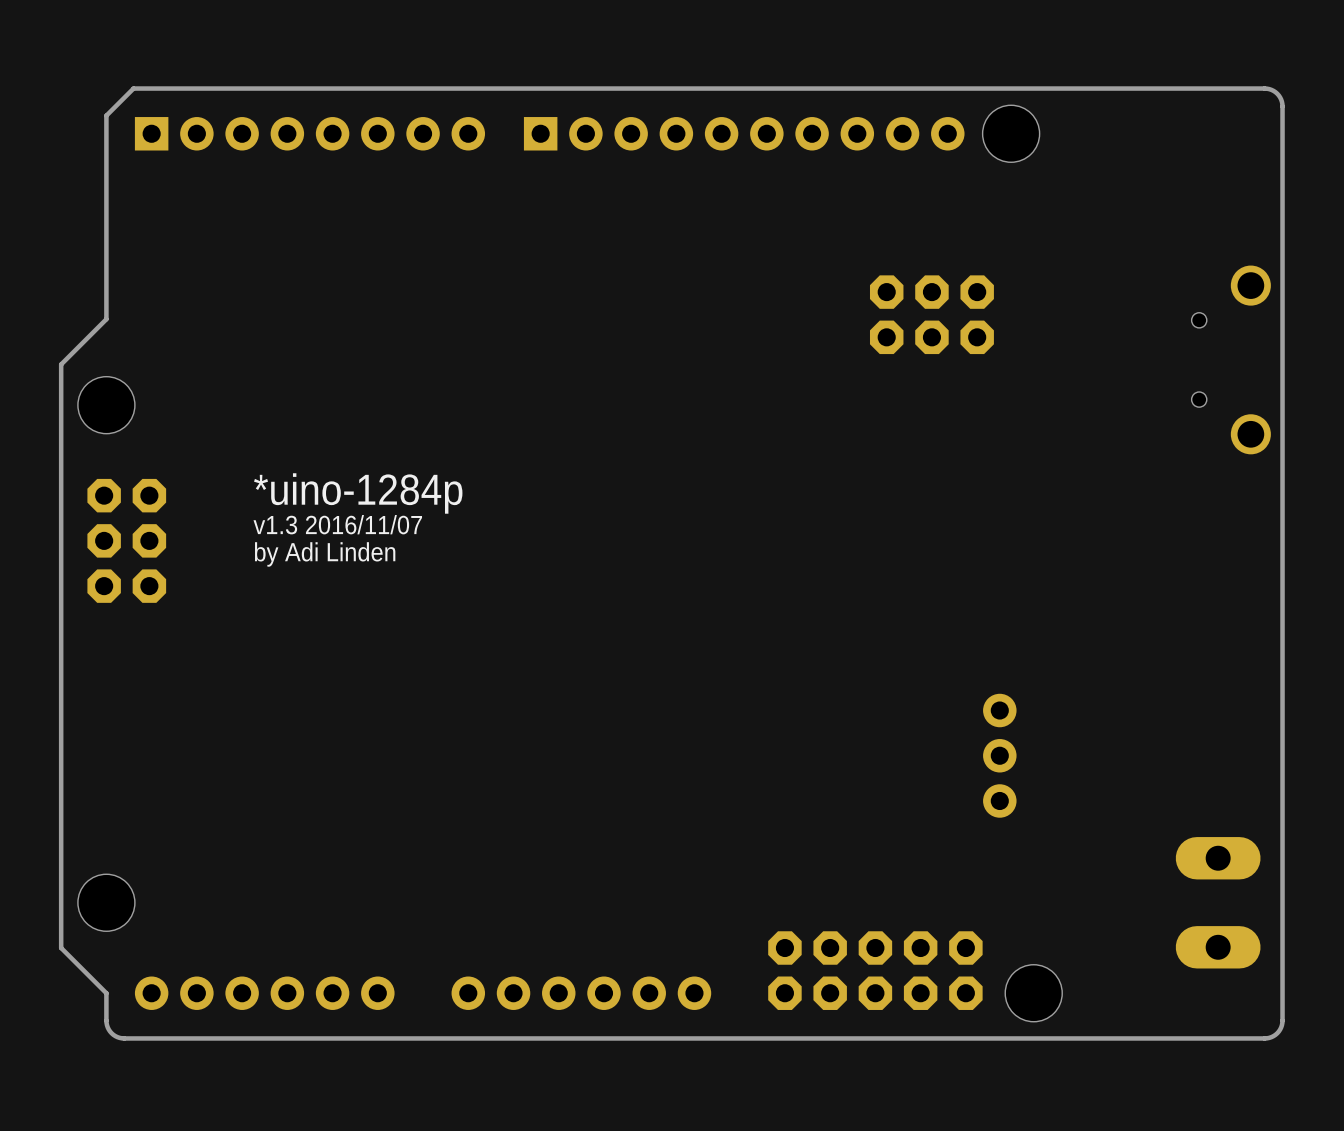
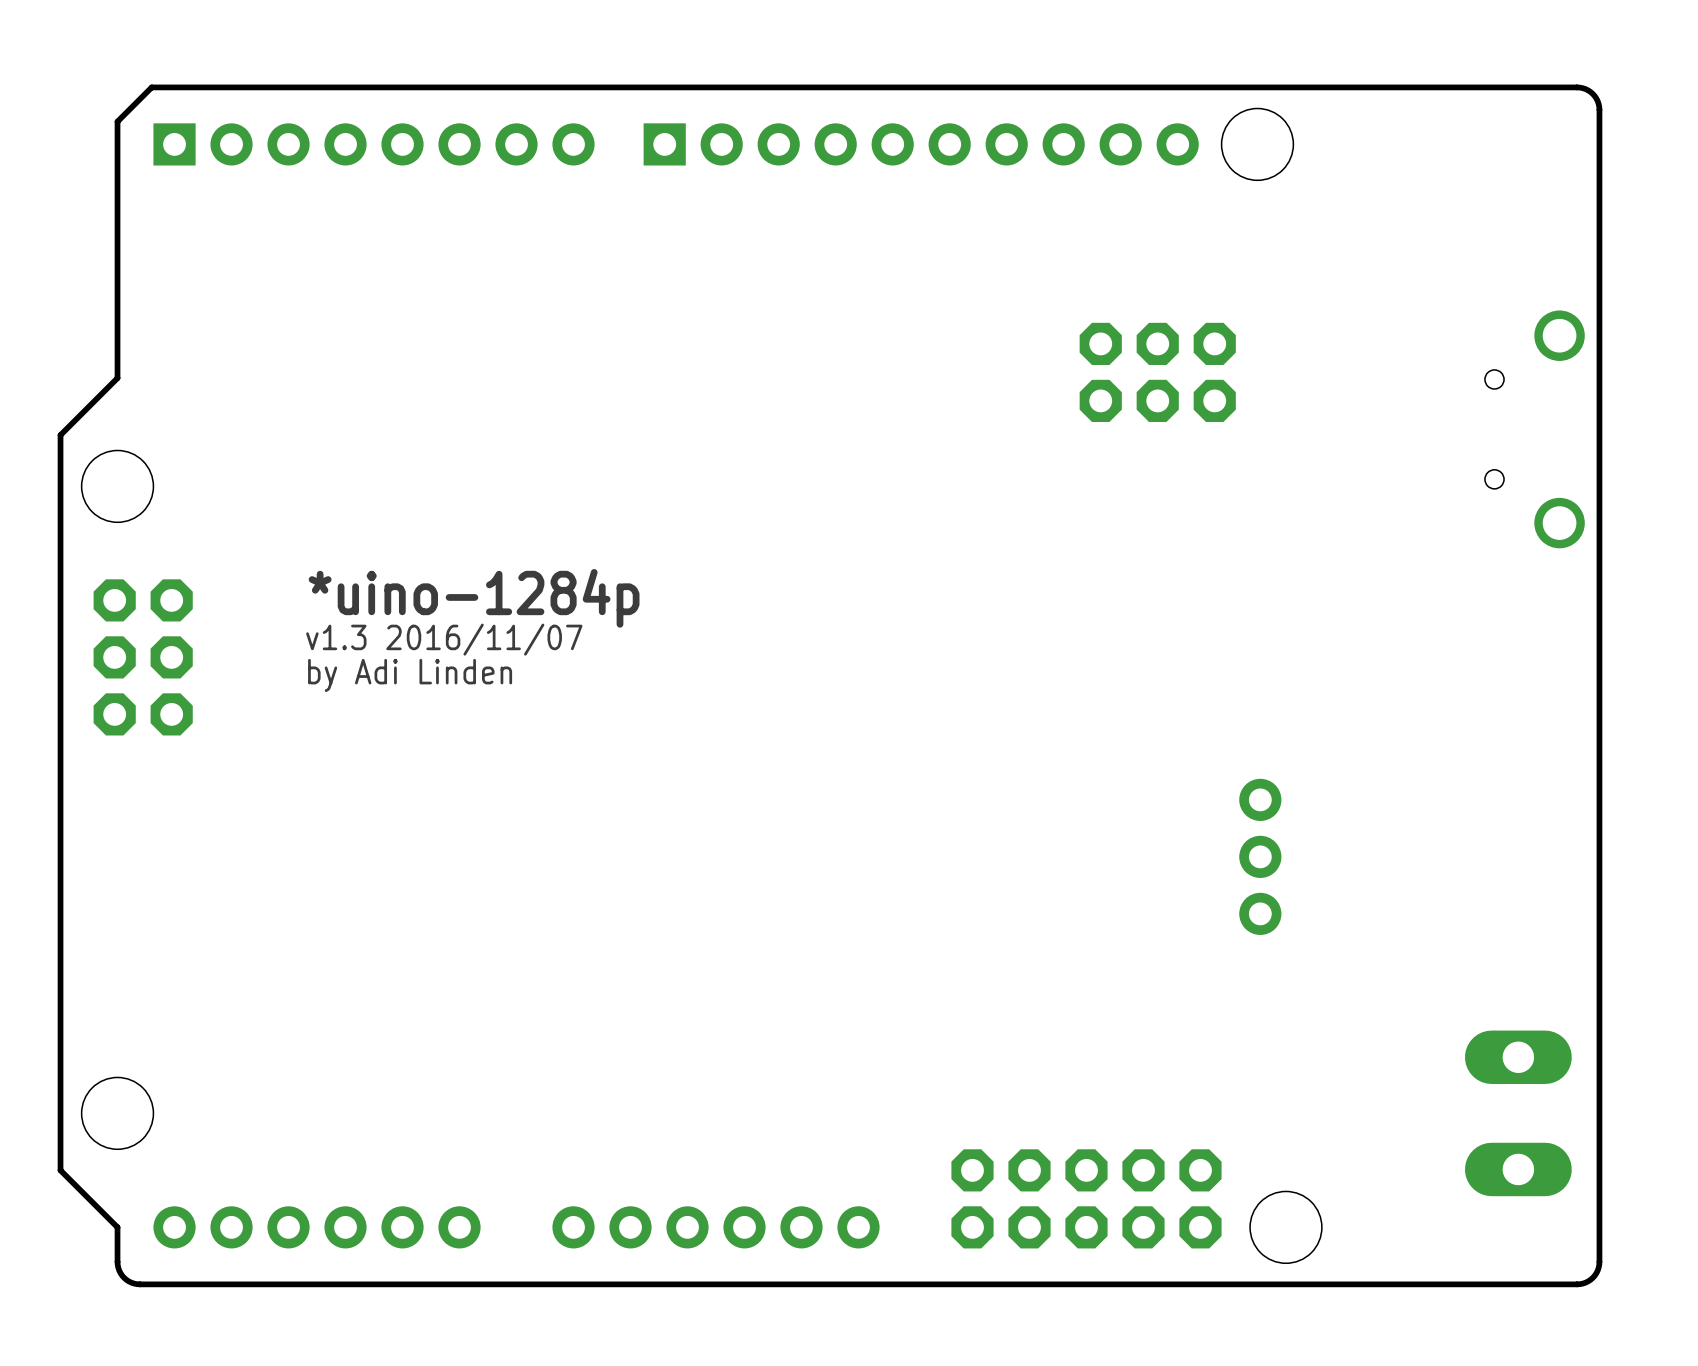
part position: (999, 755) -> (1260, 856)

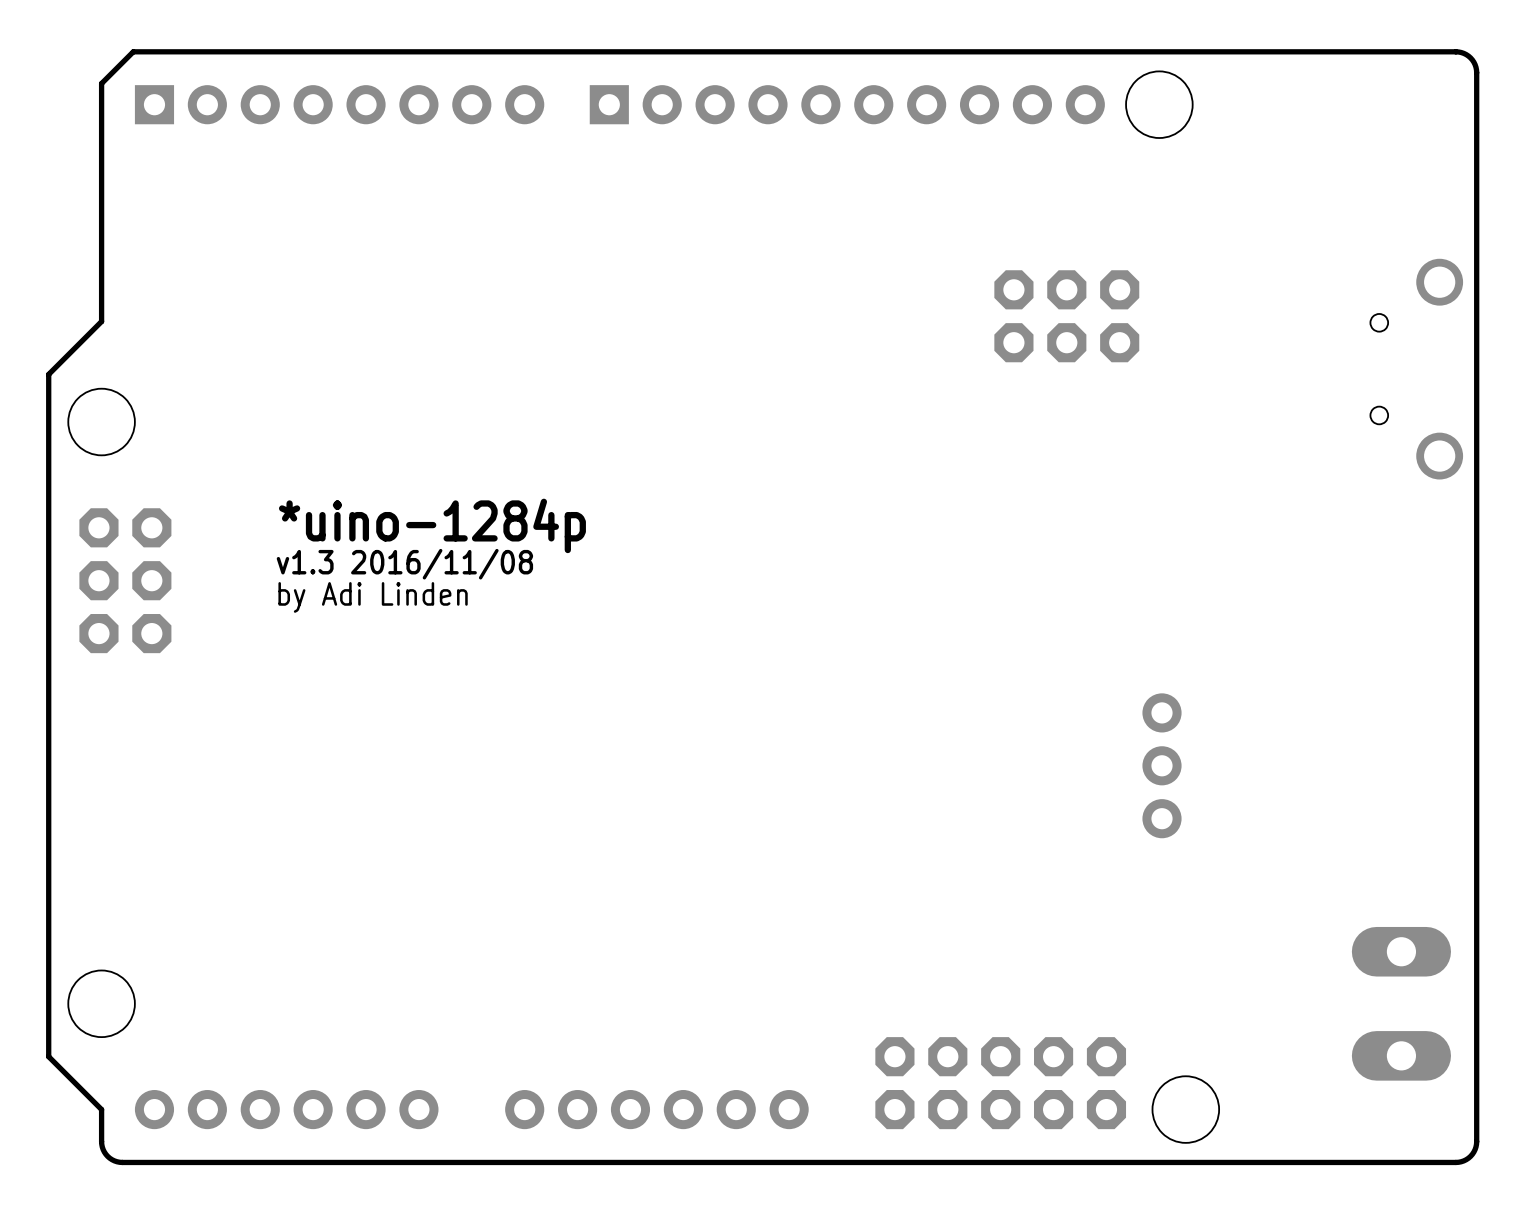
text: v1.3 2016/11/07 (444, 639) -> v1.3 2016/11/08 (404, 564)

